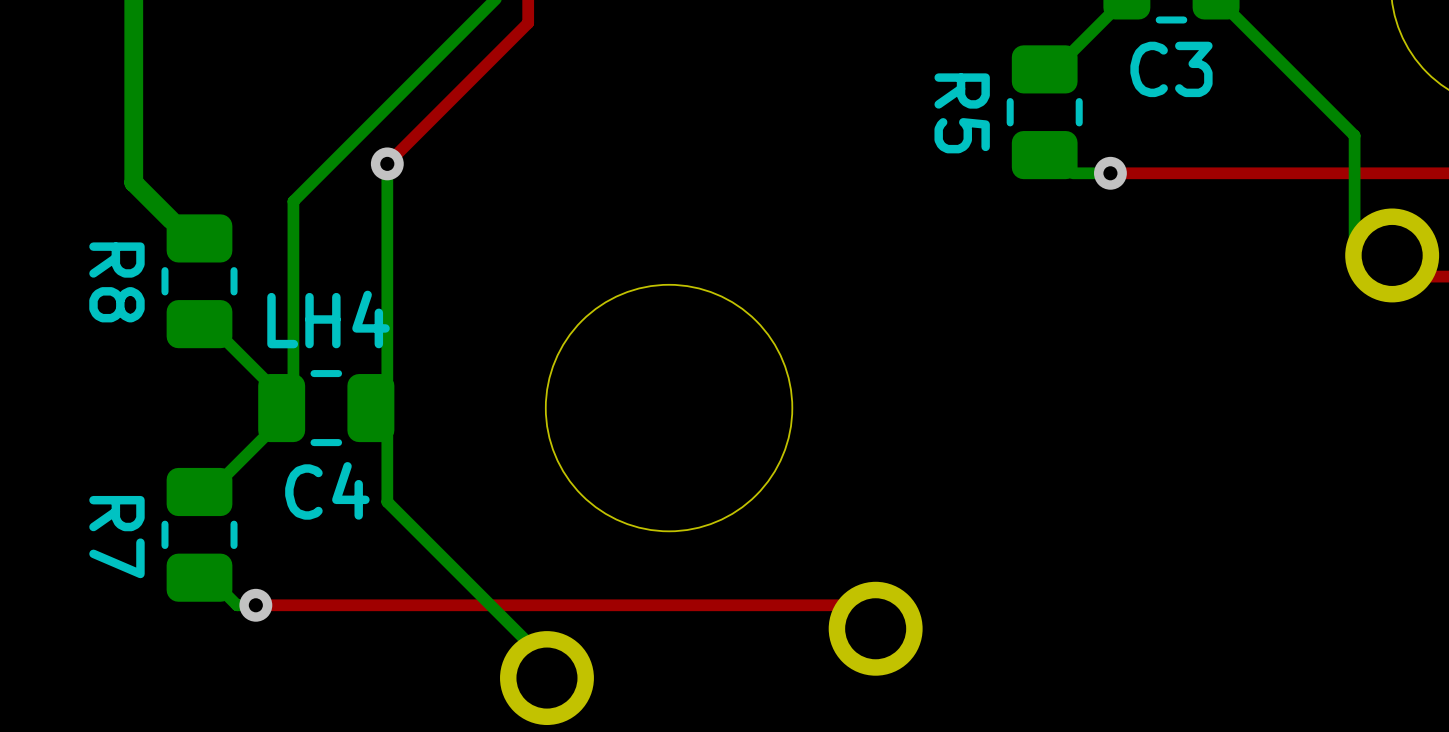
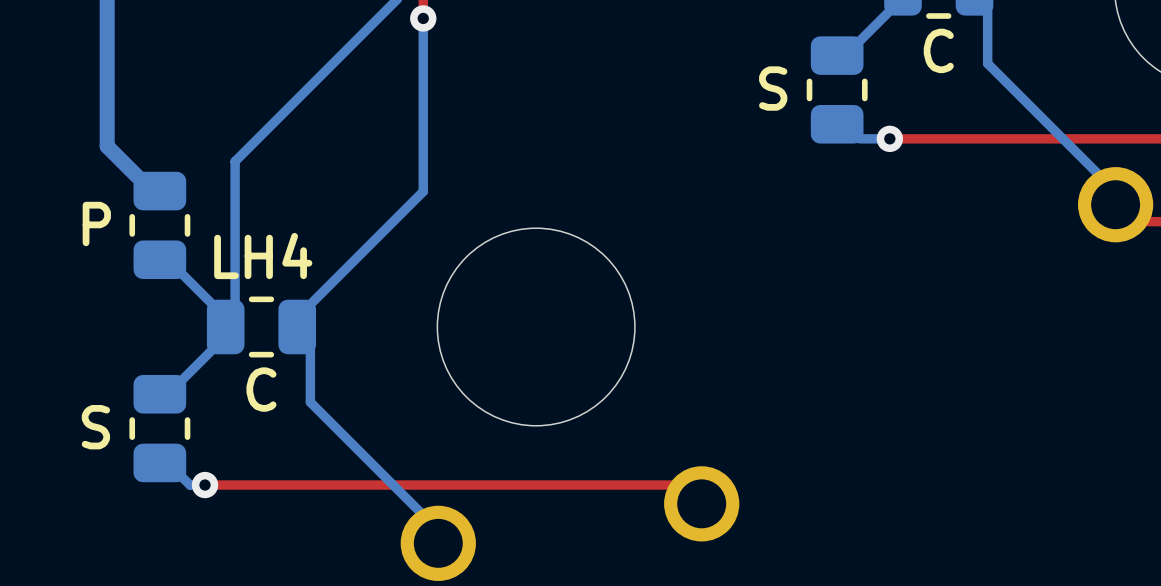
bottom track: (1232, 13) (1354, 135) (1354, 239) -> (987, 10) (987, 63) (1100, 176)
top track: (528, 23) (387, 163) -> none
text: C3 (1171, 69) -> C (938, 50)
text: R5 (962, 113) -> S (773, 88)
bottom track: (387, 163) (387, 379) -> (423, 18) (423, 191) (310, 304)
via position: (387, 163) -> (423, 18)
text: R8 (116, 282) -> P (96, 223)
text: C4 (327, 490) -> C (261, 389)
text: R7 (116, 537) -> S (95, 427)

